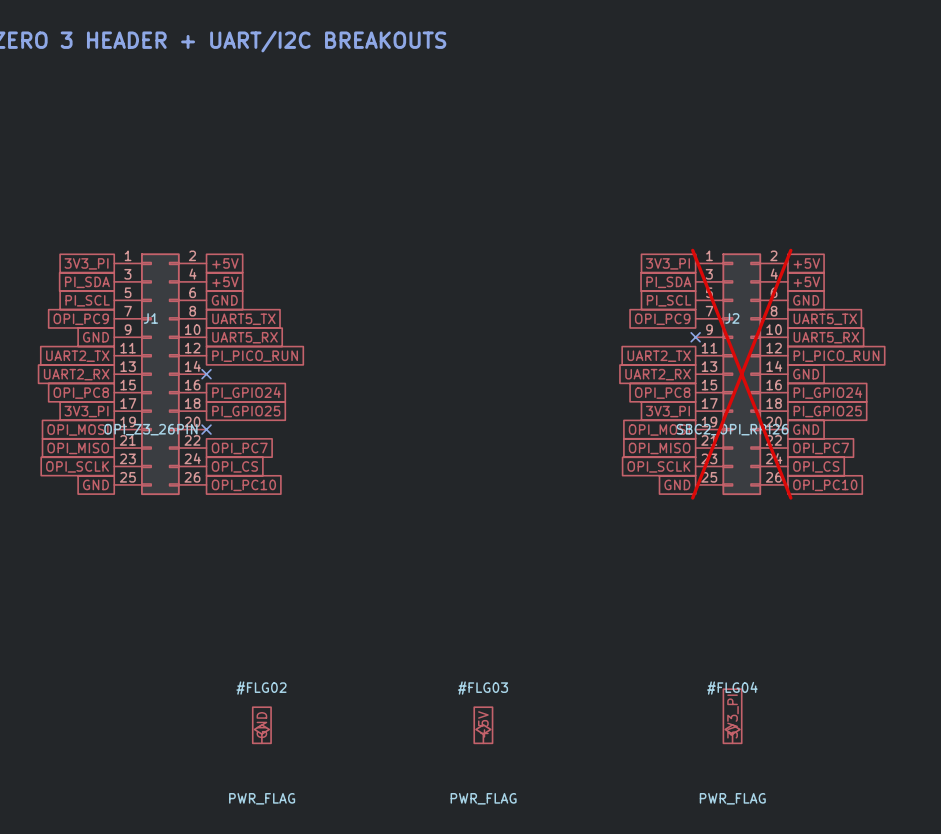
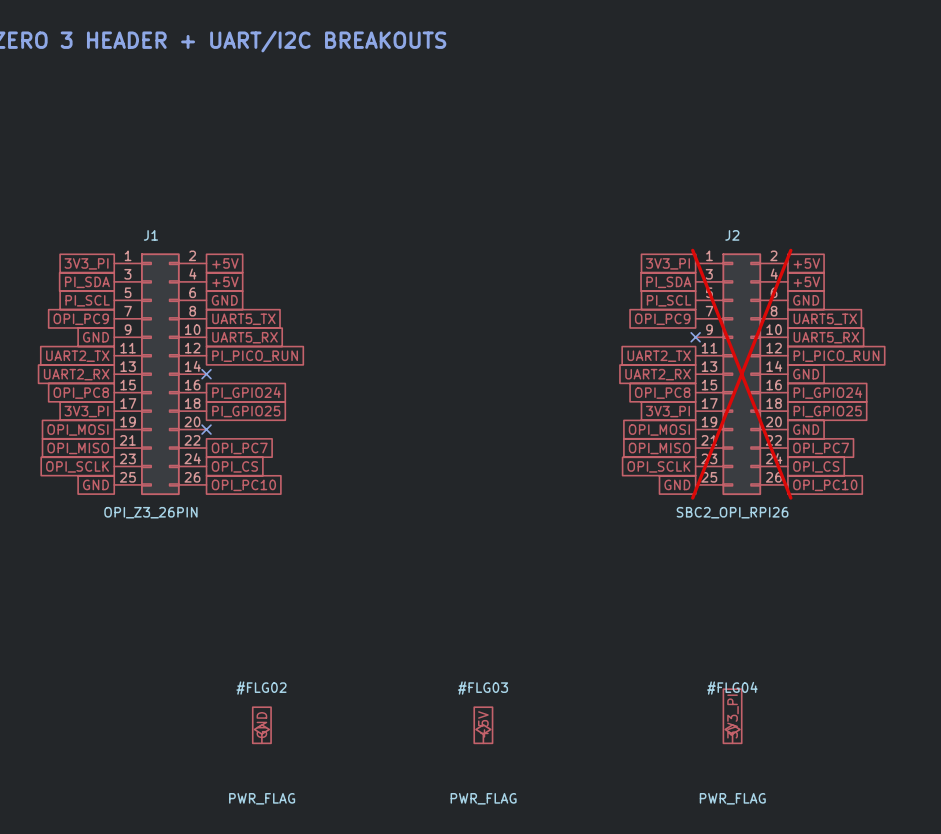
J1 name position: J1 (150, 318) -> J1 (150, 235)
J2 name position: J2 (732, 318) -> J2 (732, 235)
J1 value position: OPI_Z3_26PIN (150, 429) -> OPI_Z3_26PIN (150, 512)
J2 value position: SBC2_OPI_RPI26 (732, 429) -> SBC2_OPI_RPI26 (732, 512)

